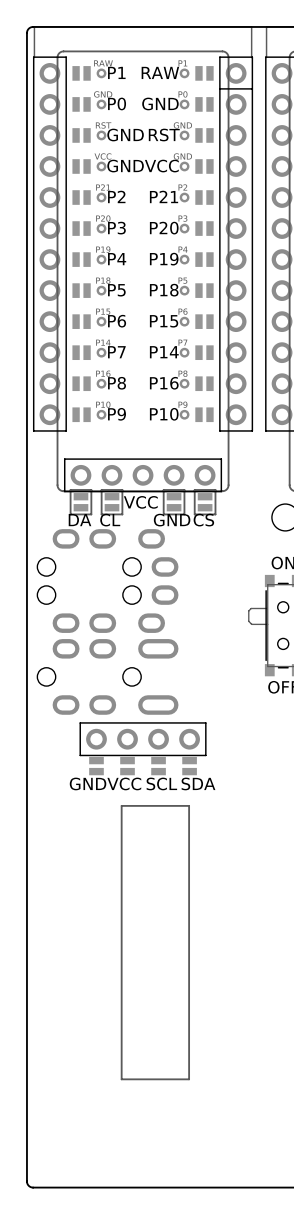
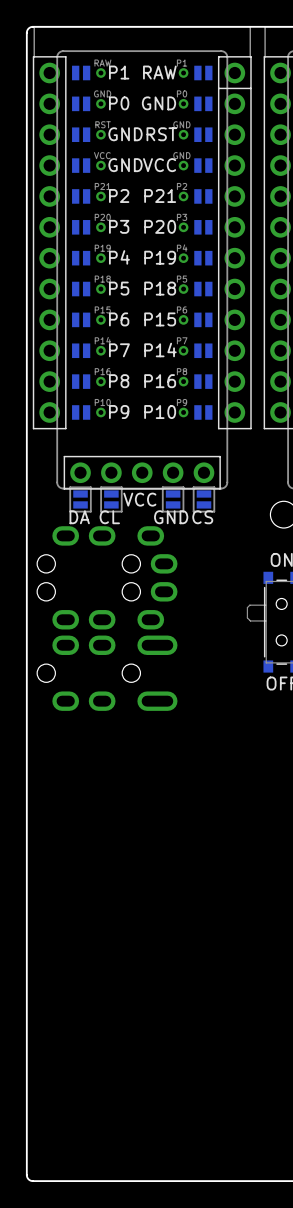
part: (143, 901) -> none

